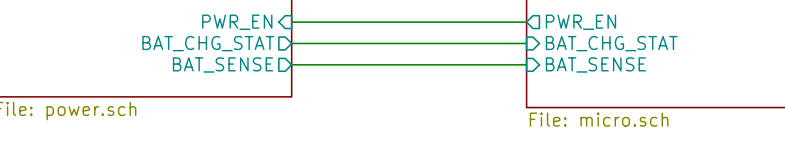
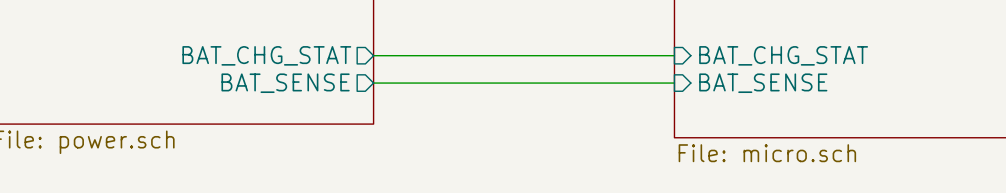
sheet pin: PWR_EN (237, 22) -> none
wire: (291, 22) (526, 22) -> none
sheet pin: PWR_EN (580, 22) -> none

